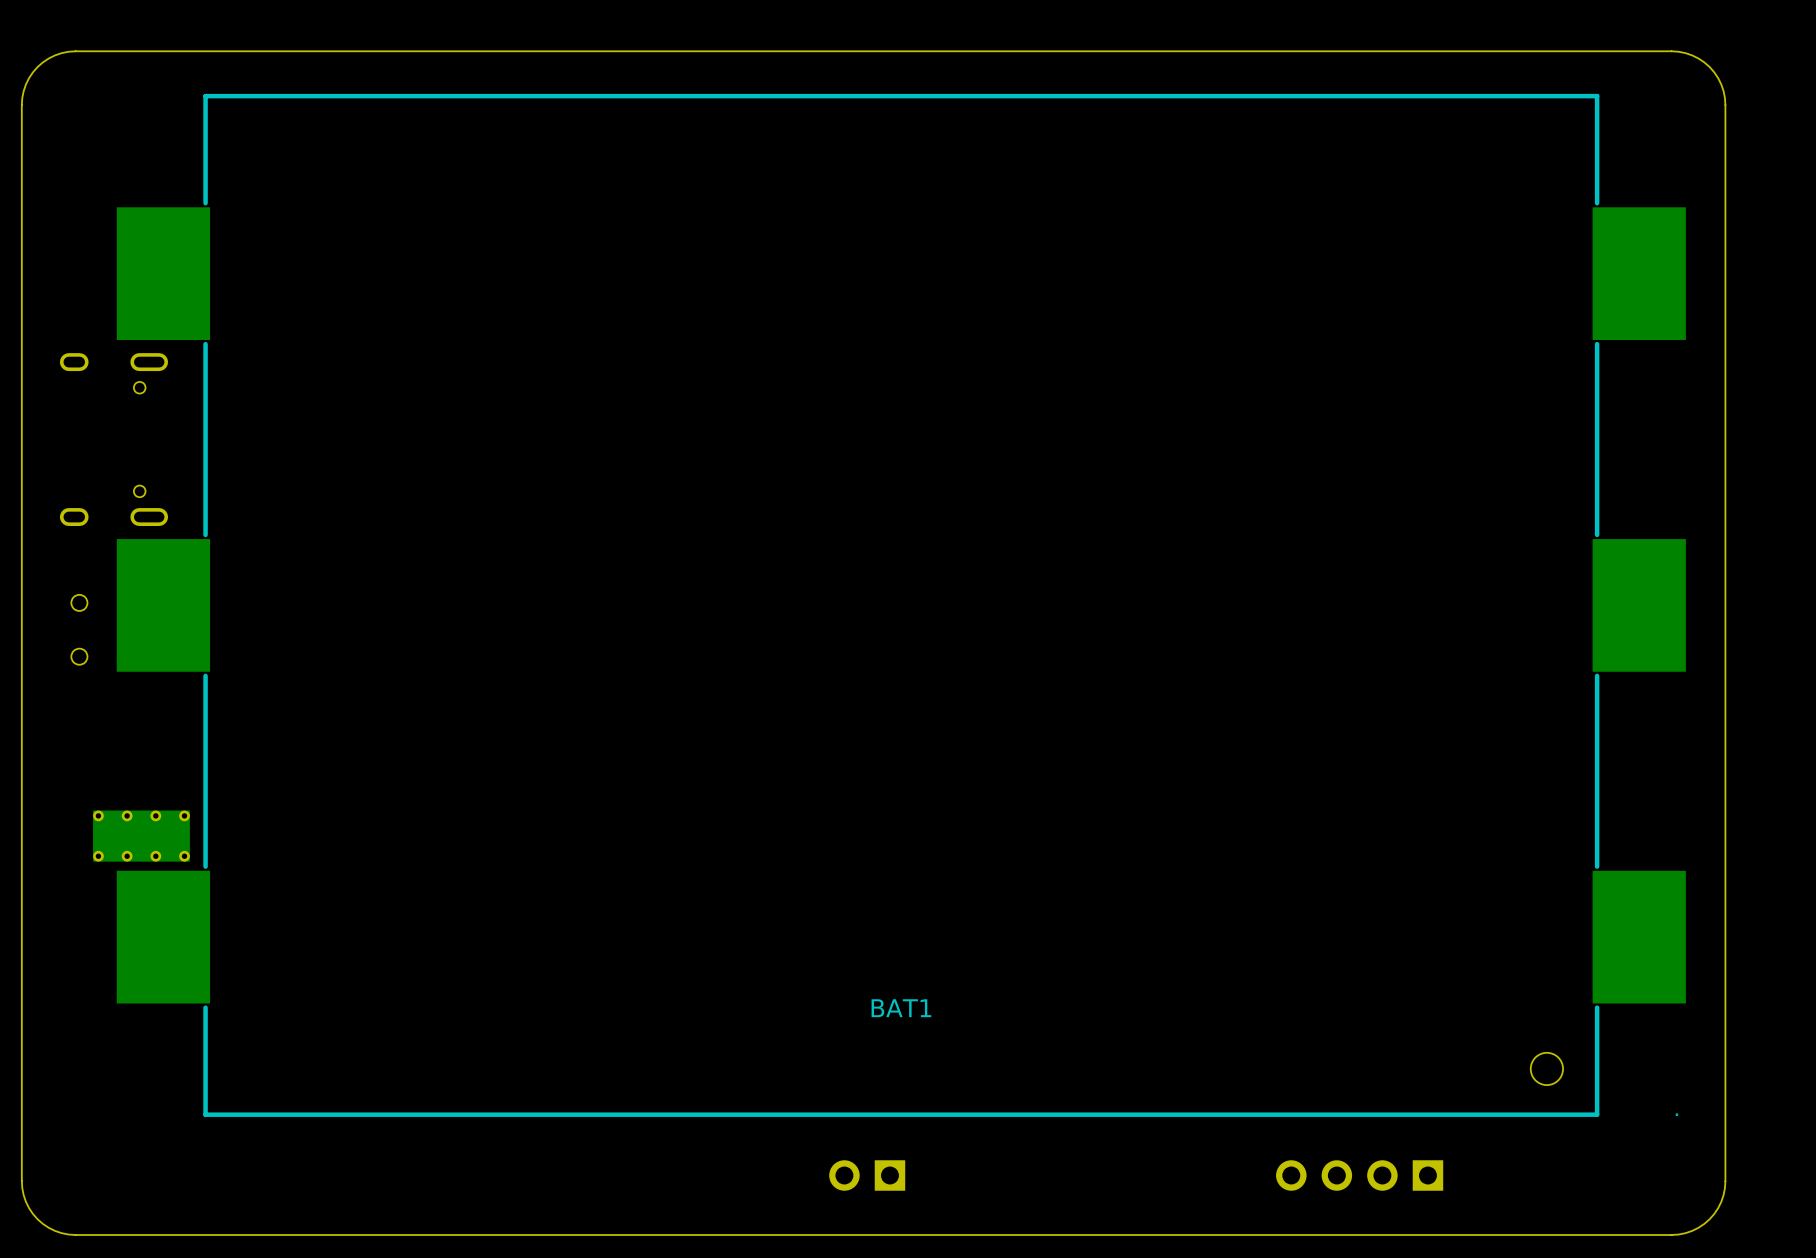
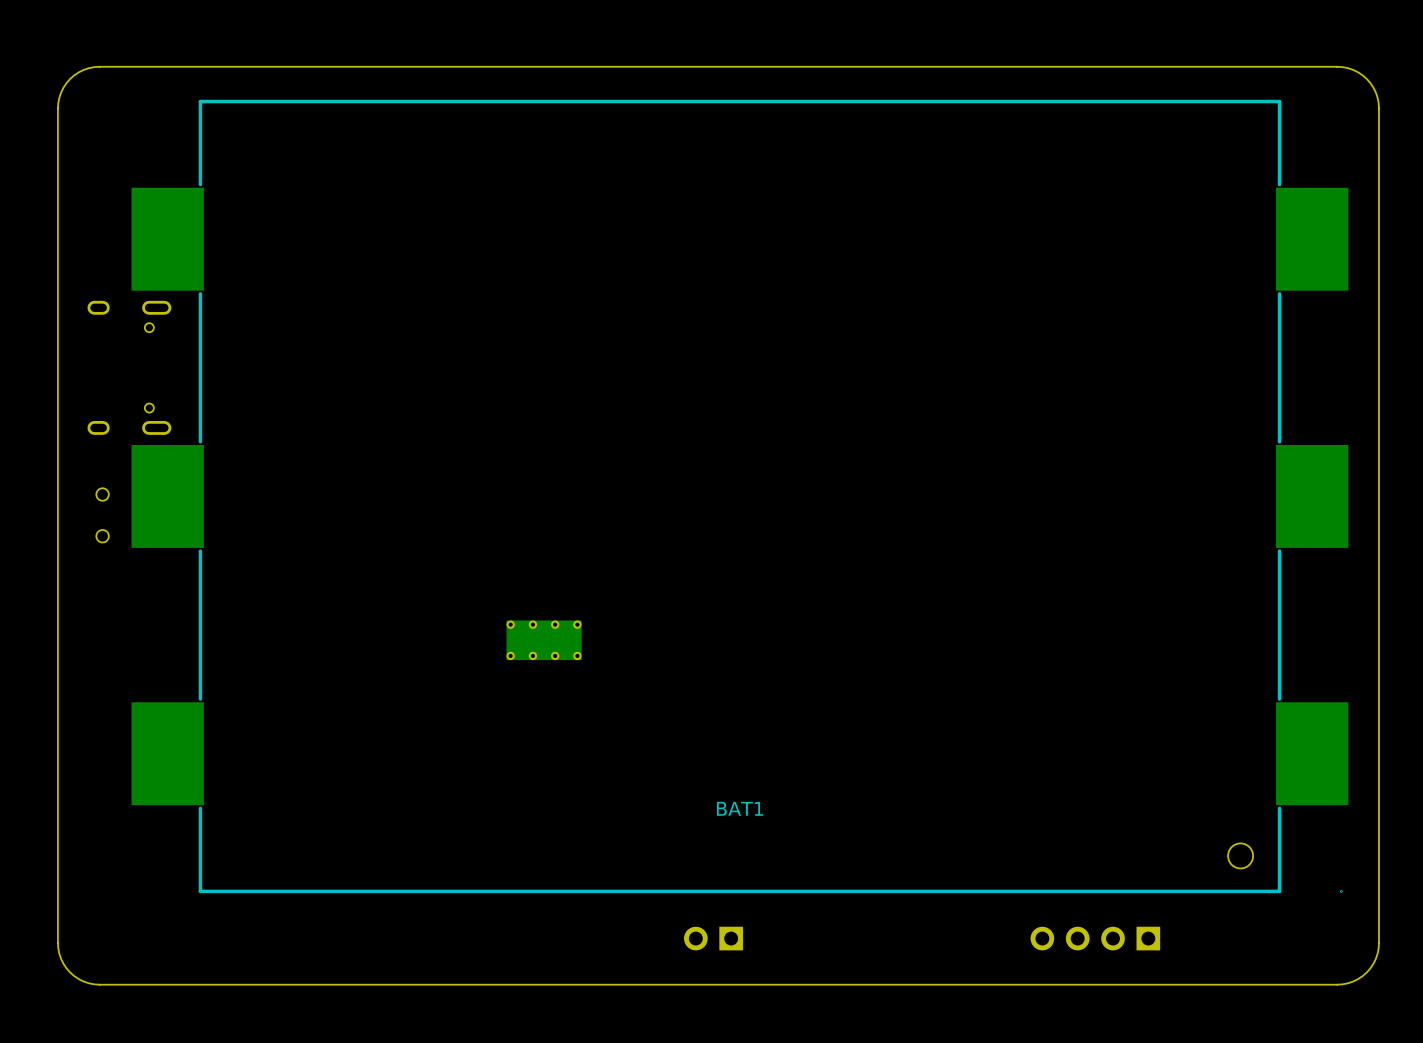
part: none -> (544, 640)
part: (141, 836) -> none

